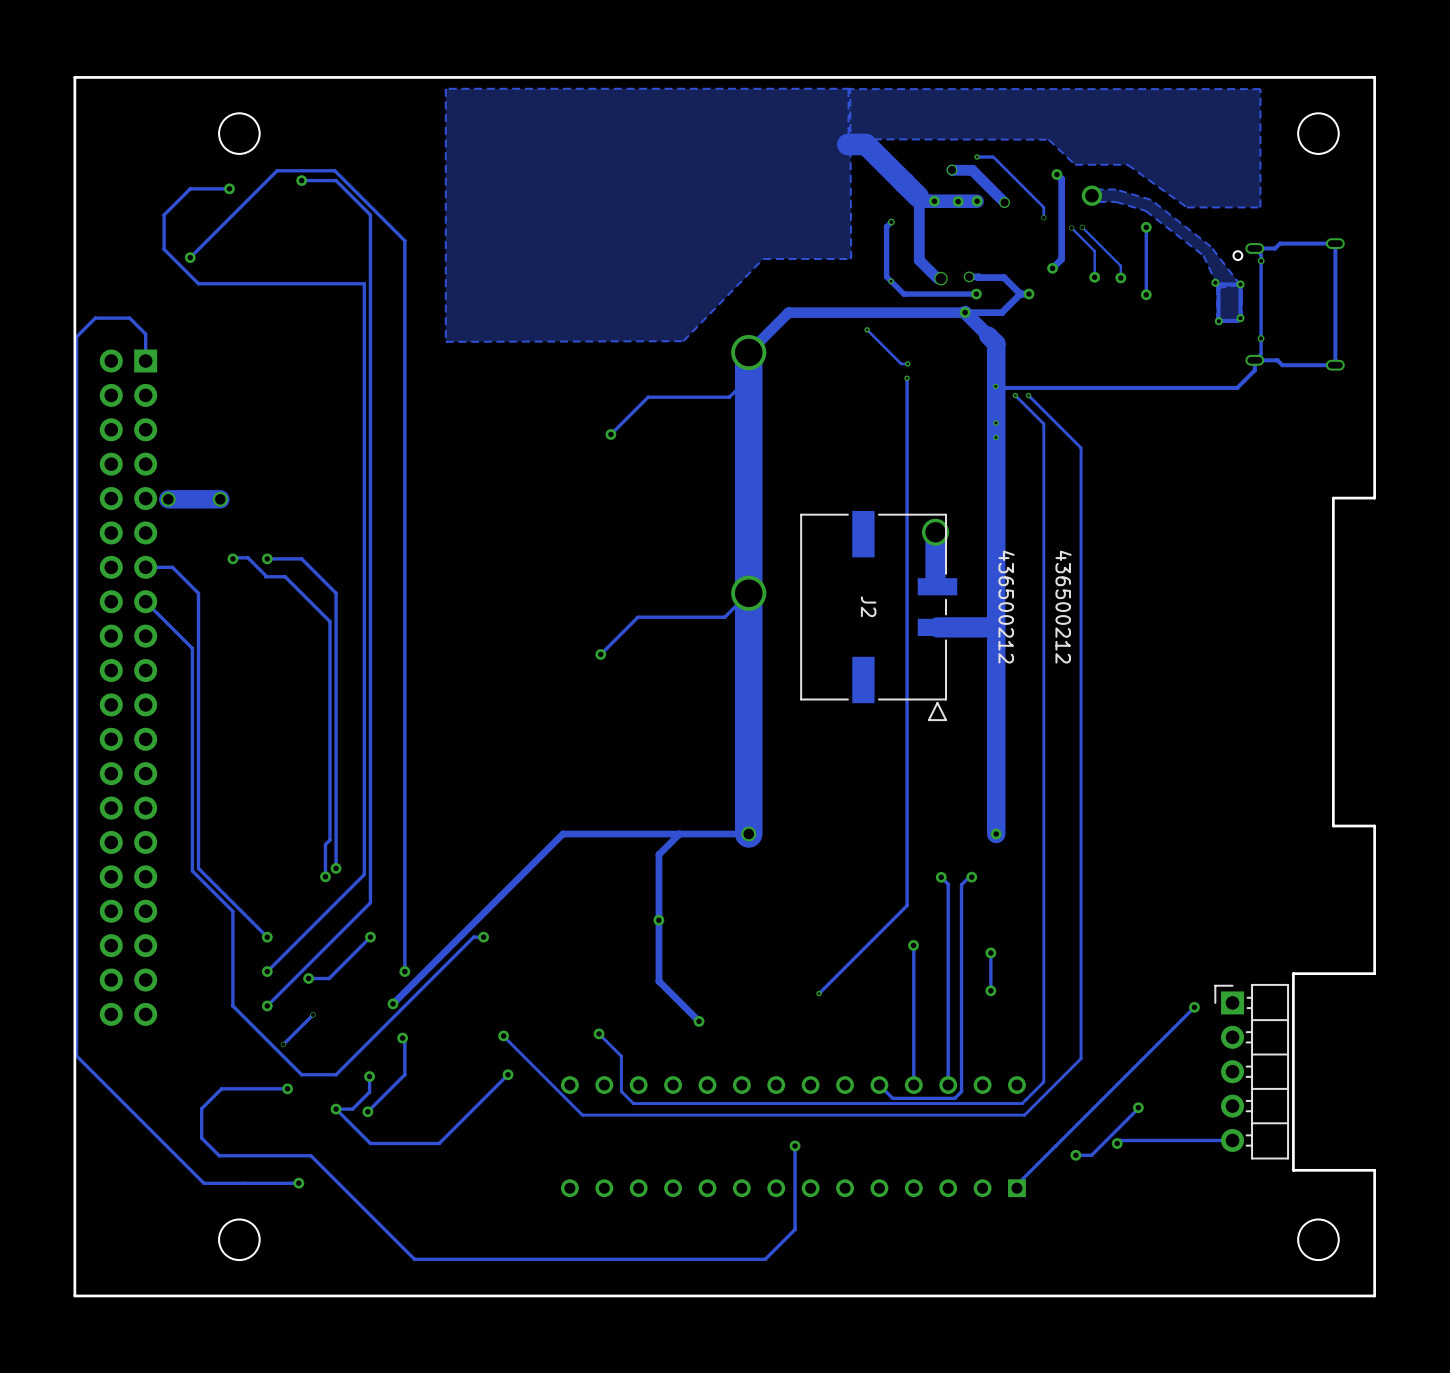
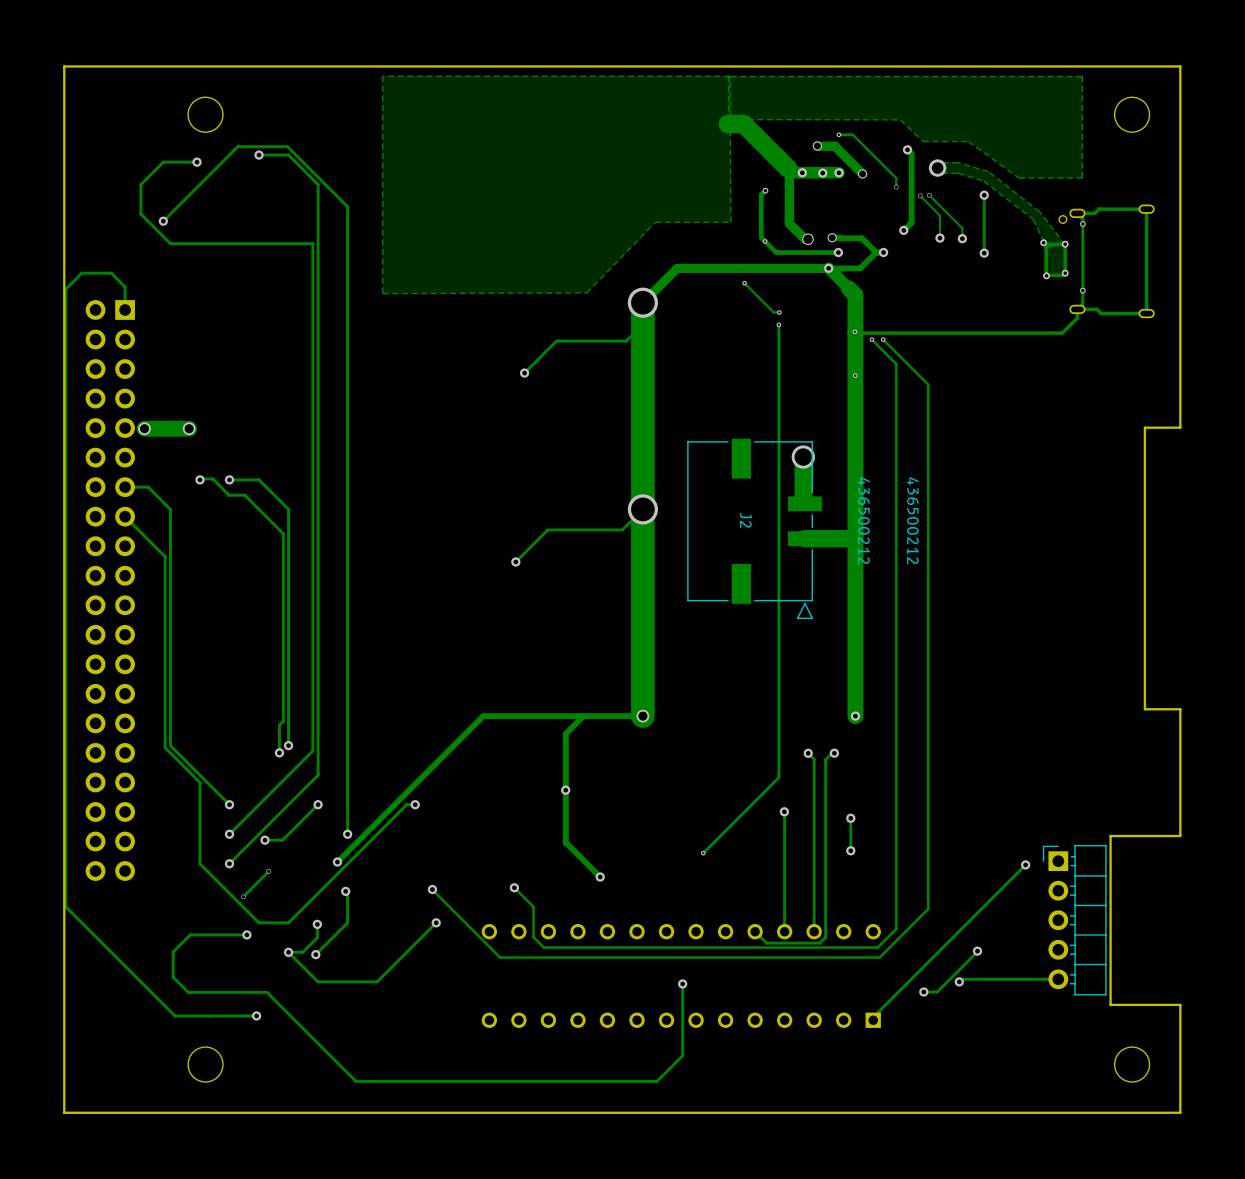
via: (996, 423) -> none

